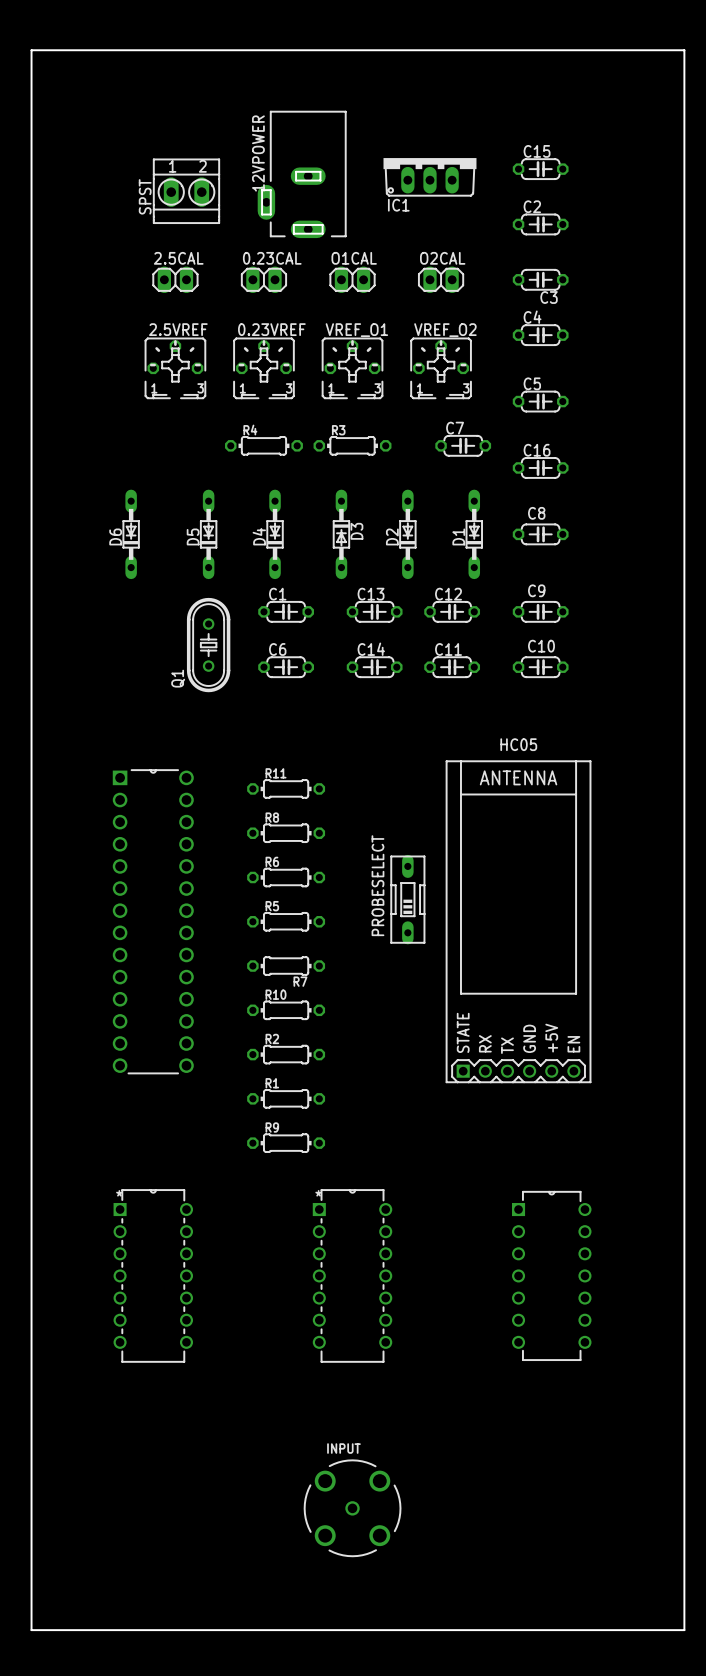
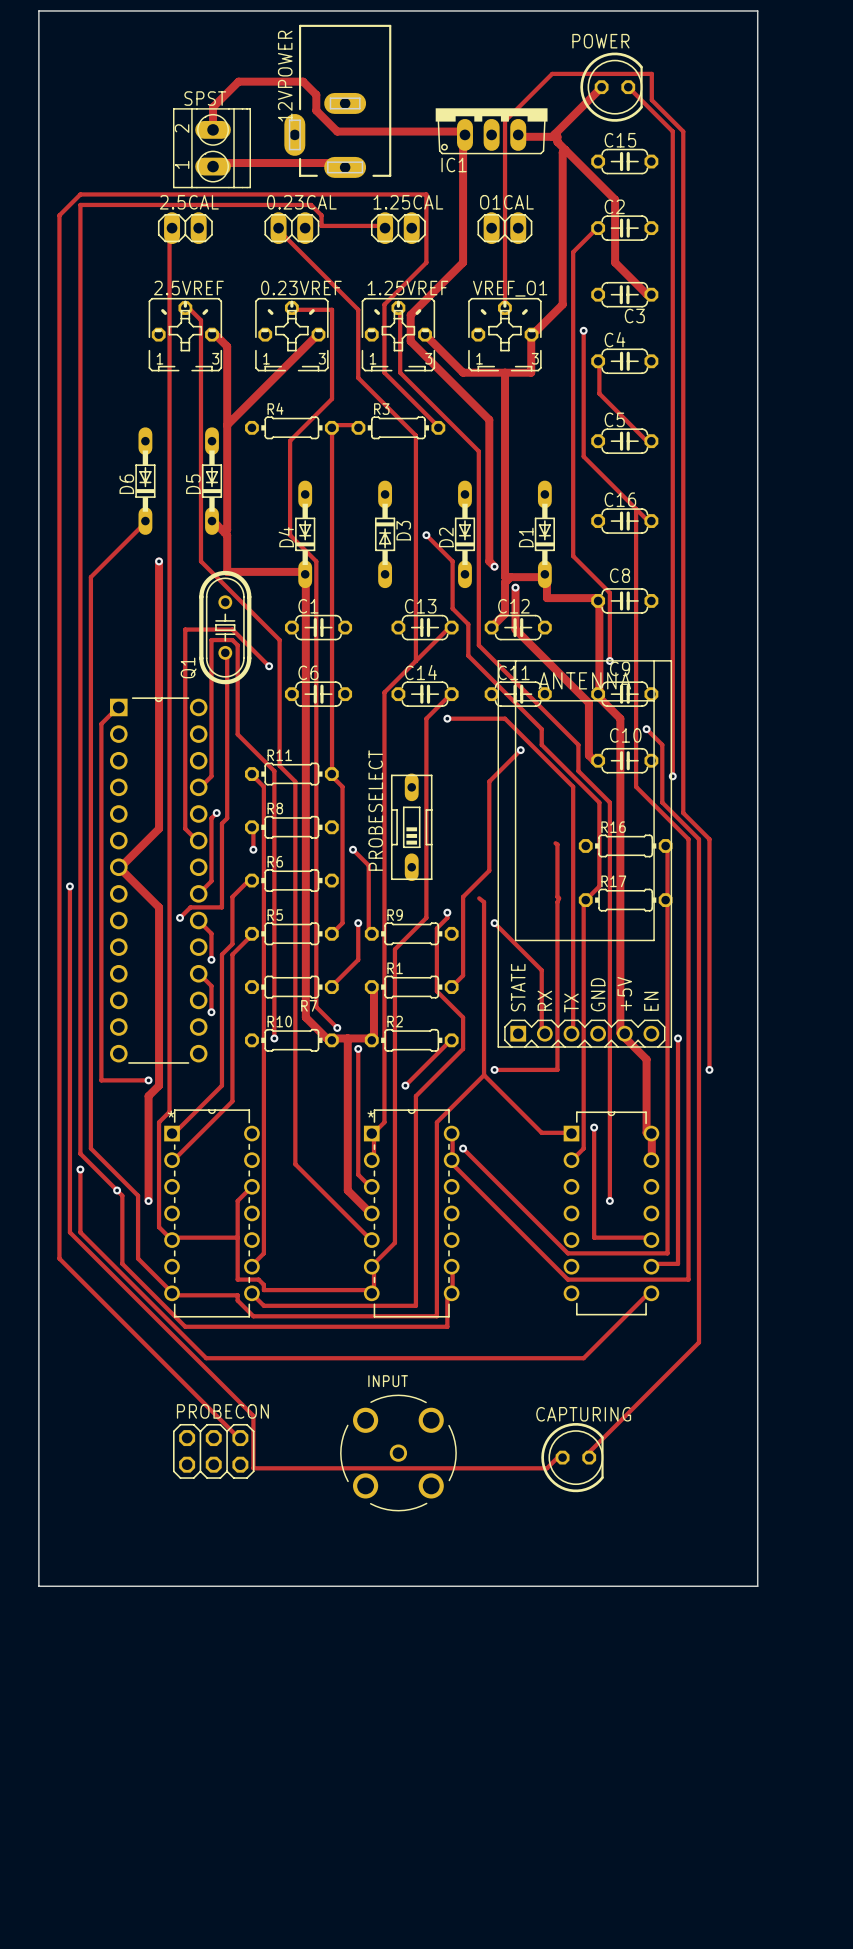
board edge: (31, 50) (684, 50) (684, 1630) (31, 1630) (31, 50) -> (38, 10) (38, 1586) (757, 1586) (757, 10) (38, 10)
track: none -> (601, 87) (552, 136) (520, 136) (518, 134)
POWER: none -> (611, 87)
track: none -> (628, 87) (672, 131) (672, 776)
track: none -> (213, 129) (213, 107) (238, 81) (303, 81) (316, 94) (316, 110) (337, 131) (463, 131) (464, 134) (463, 136) (463, 262) (410, 315) (410, 341) (489, 419) (489, 561) (494, 566)
track: none -> (554, 134) (557, 136) (557, 142) (615, 199) (615, 262) (646, 294) (651, 294)
track: none -> (565, 149) (562, 152) (562, 304) (531, 334) (531, 372) (463, 372) (425, 334)
track: none -> (213, 166) (216, 163) (342, 163) (345, 167)
12VPOWER position: (302, 174) -> (337, 101)
IC1 position: (429, 177) -> (491, 131)
SPST rotation: 0° (186, 191) -> 90° counterclockwise (211, 148)
SPST name position: SPST (145, 196) -> SPST (205, 98)
track: none -> (172, 228) (169, 231) (169, 1111) (159, 1122) (159, 1227) (172, 1240) (174, 1237) (237, 1237)
track: none -> (278, 228) (358, 309) (358, 377) (415, 435) (415, 661)
track: none -> (385, 228) (384, 225) (321, 225) (321, 215) (311, 204) (80, 204) (80, 1153) (122, 1195) (122, 1263) (185, 1326) (447, 1326) (447, 1295) (451, 1293) (452, 1290) (451, 1266)
1.25CAL: none -> (398, 228)
track: none -> (598, 228) (573, 252) (573, 556) (609, 592) (609, 661)
2.5CAL position: (175, 279) -> (185, 228)
0.23CAL position: (263, 279) -> (291, 228)
O1CAL position: (352, 279) -> (504, 228)
O2CAL: (441, 279) -> none
track: none -> (185, 308) (190, 309) (200, 320) (200, 561) (279, 640) (279, 765) (295, 781) (295, 1164) (371, 1240)
track: none -> (291, 308) (295, 309) (332, 309) (332, 398) (290, 440) (290, 535) (316, 561) (316, 1007) (337, 1027)
track: none -> (398, 308) (400, 309) (400, 372) (478, 451) (478, 645) (578, 744) (578, 771) (609, 802) (609, 1200)
track: none -> (504, 308) (505, 121) (552, 73) (651, 73) (651, 100) (683, 131) (683, 813) (709, 839) (709, 1069)
track: none -> (583, 330) (583, 456) (646, 519) (651, 521)
via: none -> (583, 330)
track: none -> (211, 334) (216, 336) (227, 346) (227, 529) (224, 532)
track: none -> (318, 334) (227, 425)
1.25VREF: none -> (398, 334)
track: none -> (598, 361) (599, 393) (646, 440) (651, 441)
track: none -> (505, 372) (505, 577) (507, 579)
2.5VREF position: (175, 368) -> (185, 334)
0.23VREF position: (263, 368) -> (291, 334)
VREF_O1 position: (352, 368) -> (504, 334)
VREF_O2: (441, 368) -> none
track: none -> (358, 427) (358, 425) (332, 425) (331, 427) (331, 774) (342, 786) (342, 923) (331, 933)
track: none -> (438, 427) (384, 372) (384, 304) (426, 262) (426, 194) (80, 194) (59, 215) (59, 1258) (240, 1438)
R4 position: (263, 445) -> (291, 427)
R3 position: (352, 445) -> (398, 427)
C7: (463, 445) -> none
track: none -> (636, 508) (636, 786) (688, 839) (688, 1279) (567, 1279) (452, 1164) (451, 1133)
track: none -> (145, 521) (90, 577) (90, 1148) (138, 1195) (138, 1258) (174, 1295) (237, 1295) (237, 1300) (253, 1316) (436, 1316) (436, 1122) (484, 1075)
track: none -> (211, 521) (227, 535) (227, 571) (300, 571) (305, 574) (305, 577) (305, 1017) (326, 1038) (331, 1040) (332, 1038) (368, 1038) (371, 1040) (373, 1038) (373, 991) (371, 987)
track: none -> (426, 535) (452, 561) (452, 608) (468, 624) (468, 655) (541, 729) (541, 744) (599, 802) (599, 886) (583, 902) (583, 1148) (571, 1160)
via: none -> (426, 535)
track: none -> (159, 561) (159, 828) (118, 867) (159, 907) (159, 1085) (148, 1096) (148, 1200)
via: none -> (159, 561)
via: none -> (494, 566)
track: none -> (515, 587) (515, 629) (588, 702) (588, 755) (594, 760) (598, 760)
via: none -> (515, 587)
D6 position: (131, 534) -> (145, 481)
D5 position: (208, 534) -> (211, 481)
D4 position: (275, 534) -> (305, 534)
D3 position: (341, 534) -> (385, 534)
D2 position: (407, 534) -> (464, 534)
D1 position: (474, 534) -> (544, 534)
C1: none -> (318, 627)
C13: none -> (425, 627)
track: none -> (451, 627) (447, 629) (384, 692) (384, 1122) (371, 1133) (373, 1138) (373, 1159) (371, 1160)
track: none -> (491, 627) (505, 613) (505, 582) (510, 577) (541, 577) (544, 574) (546, 577) (546, 598) (594, 598) (599, 603) (598, 694) (620, 718) (620, 1033) (624, 1033) (625, 1038) (646, 1059) (646, 1132) (651, 1133) (651, 1160)
C12: none -> (518, 627)
track: none -> (225, 652) (227, 655) (227, 818) (221, 823) (221, 907) (190, 907) (180, 917)
via: none -> (609, 661)
track: none -> (269, 666) (232, 629) (185, 629) (185, 828) (198, 840)
via: none -> (269, 666)
C1 name: C1 (277, 594) -> C6 (308, 672)
C13 name: C13 (371, 594) -> C14 (420, 672)
C12 name: C12 (448, 594) -> C11 (513, 672)
track: none -> (451, 694) (426, 718) (426, 917) (394, 949) (394, 1242) (371, 1266) (373, 1269) (373, 1290) (371, 1293) (368, 1290) (263, 1290) (263, 1284) (258, 1279) (237, 1279) (237, 1200) (251, 1186)
track: none -> (118, 707) (101, 723) (101, 1080) (148, 1080)
track: none -> (447, 718) (505, 718) (573, 786) (573, 1033) (571, 1033)
via: none -> (447, 718)
track: none -> (646, 729) (662, 744) (662, 802) (698, 839) (698, 1342) (588, 1452) (589, 1457)
via: none -> (646, 729)
Q1 position: (208, 645) -> (225, 627)
track: none -> (520, 750) (489, 781) (489, 870) (463, 896) (463, 975) (451, 987)
via: none -> (520, 750)
C6: (286, 667) -> none
C14: (374, 667) -> none
C11: (452, 667) -> none
track: none -> (251, 774) (263, 786) (263, 1253) (251, 1266)
via: none -> (672, 776)
track: none -> (198, 787) (211, 776) (211, 640) (232, 640) (237, 645) (237, 734) (274, 771) (274, 1038)
track: none -> (216, 813) (211, 818) (211, 881) (198, 893)
via: none -> (216, 813)
track: none -> (251, 827) (253, 849)
track: none -> (555, 843) (557, 844) (557, 896) (559, 898) (557, 902) (557, 1069) (494, 1069)
R16: none -> (625, 845)
track: none -> (665, 845) (667, 849) (667, 896) (665, 900) (667, 902) (667, 1253) (567, 1253) (463, 1148)
via: none -> (253, 849)
track: none -> (353, 849) (368, 865) (368, 933) (371, 933)
via: none -> (353, 849)
part: none -> (584, 853)
track: none -> (251, 880) (248, 881) (232, 896) (232, 944) (221, 954) (221, 1085) (172, 1133)
track: none -> (69, 886) (69, 1232) (253, 1415) (253, 1468) (546, 1468) (557, 1457) (562, 1457)
via: none -> (69, 886)
track: none -> (479, 898) (484, 902) (484, 1075)
R17: none -> (625, 900)
R11 position: (286, 788) -> (291, 774)
track: none -> (447, 912) (447, 917) (436, 928) (436, 991) (463, 1017) (463, 1048) (415, 1096) (415, 1305) (263, 1305) (251, 1293)
via: none -> (447, 912)
via: none -> (180, 917)
track: none -> (198, 920) (211, 933) (211, 959)
track: none -> (358, 923) (358, 959) (331, 987)
via: none -> (358, 923)
track: none -> (494, 923) (541, 970) (541, 1033) (544, 1033)
via: none -> (494, 923)
track: none -> (251, 933) (232, 954) (232, 1101) (172, 1160)
via: none -> (211, 959)
R8 position: (286, 833) -> (291, 827)
track: none -> (198, 973) (211, 986) (211, 1012)
via: none -> (211, 1012)
R6 position: (286, 877) -> (291, 880)
via: none -> (337, 1027)
via: none -> (274, 1038)
track: none -> (347, 1038) (347, 1190) (371, 1213)
track: none -> (678, 1038) (678, 1263) (651, 1263) (651, 1266)
via: none -> (678, 1038)
track: none -> (451, 1040) (405, 1085)
PROBESELECT position: (407, 899) -> (411, 827)
track: none -> (358, 1048) (358, 1174) (371, 1186)
via: none -> (358, 1048)
part position: (153, 921) -> (158, 880)
R5 position: (286, 921) -> (291, 933)
HC05: (518, 921) -> none
via: none -> (494, 1069)
via: none -> (709, 1069)
track: none -> (484, 1075) (541, 1132) (571, 1133)
via: none -> (148, 1080)
via: none -> (405, 1085)
R7 position: (286, 966) -> (291, 987)
track: none -> (594, 1127) (594, 1237) (646, 1237) (651, 1240)
via: none -> (594, 1127)
via: none -> (463, 1148)
track: none -> (80, 1169) (80, 1232) (206, 1358) (583, 1358) (646, 1295) (651, 1293)
via: none -> (80, 1169)
R10 position: (286, 1010) -> (291, 1040)
via: none -> (117, 1190)
via: none -> (148, 1200)
via: none -> (609, 1200)
part: none -> (211, 1213)
part: none -> (411, 1213)
part: none -> (611, 1213)
R2 position: (286, 1054) -> (411, 1040)
R1 position: (286, 1098) -> (411, 987)
R9 position: (286, 1143) -> (411, 933)
PROBECON: none -> (213, 1451)
INPUT: none -> (398, 1453)
CAPTURING: none -> (572, 1457)
part: (153, 1275) -> none
part: (352, 1275) -> none
part: (551, 1275) -> none
INPUT: (352, 1508) -> none

